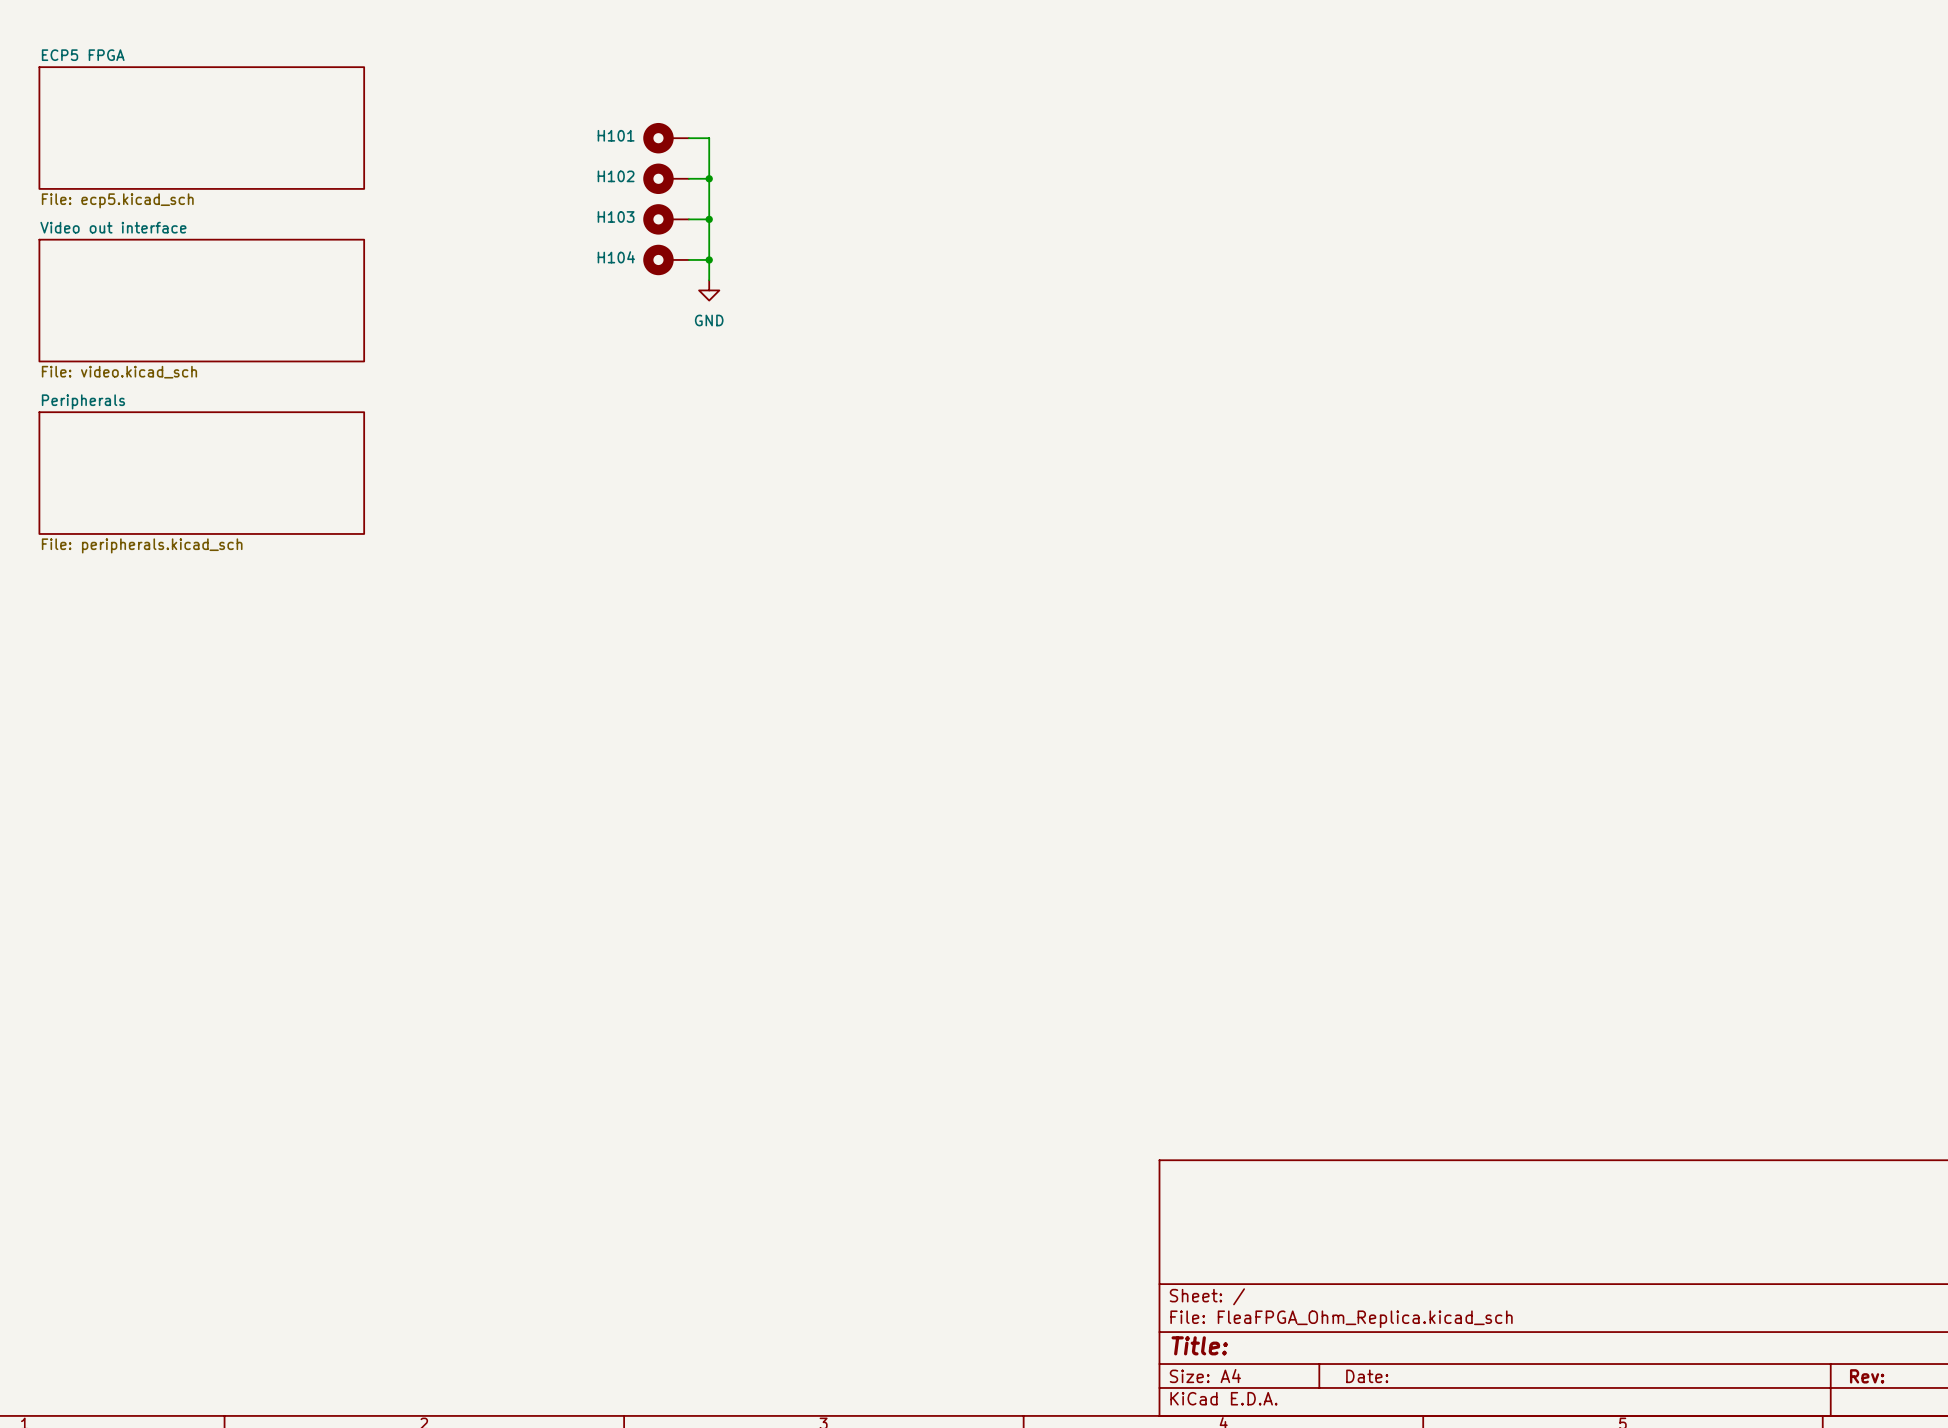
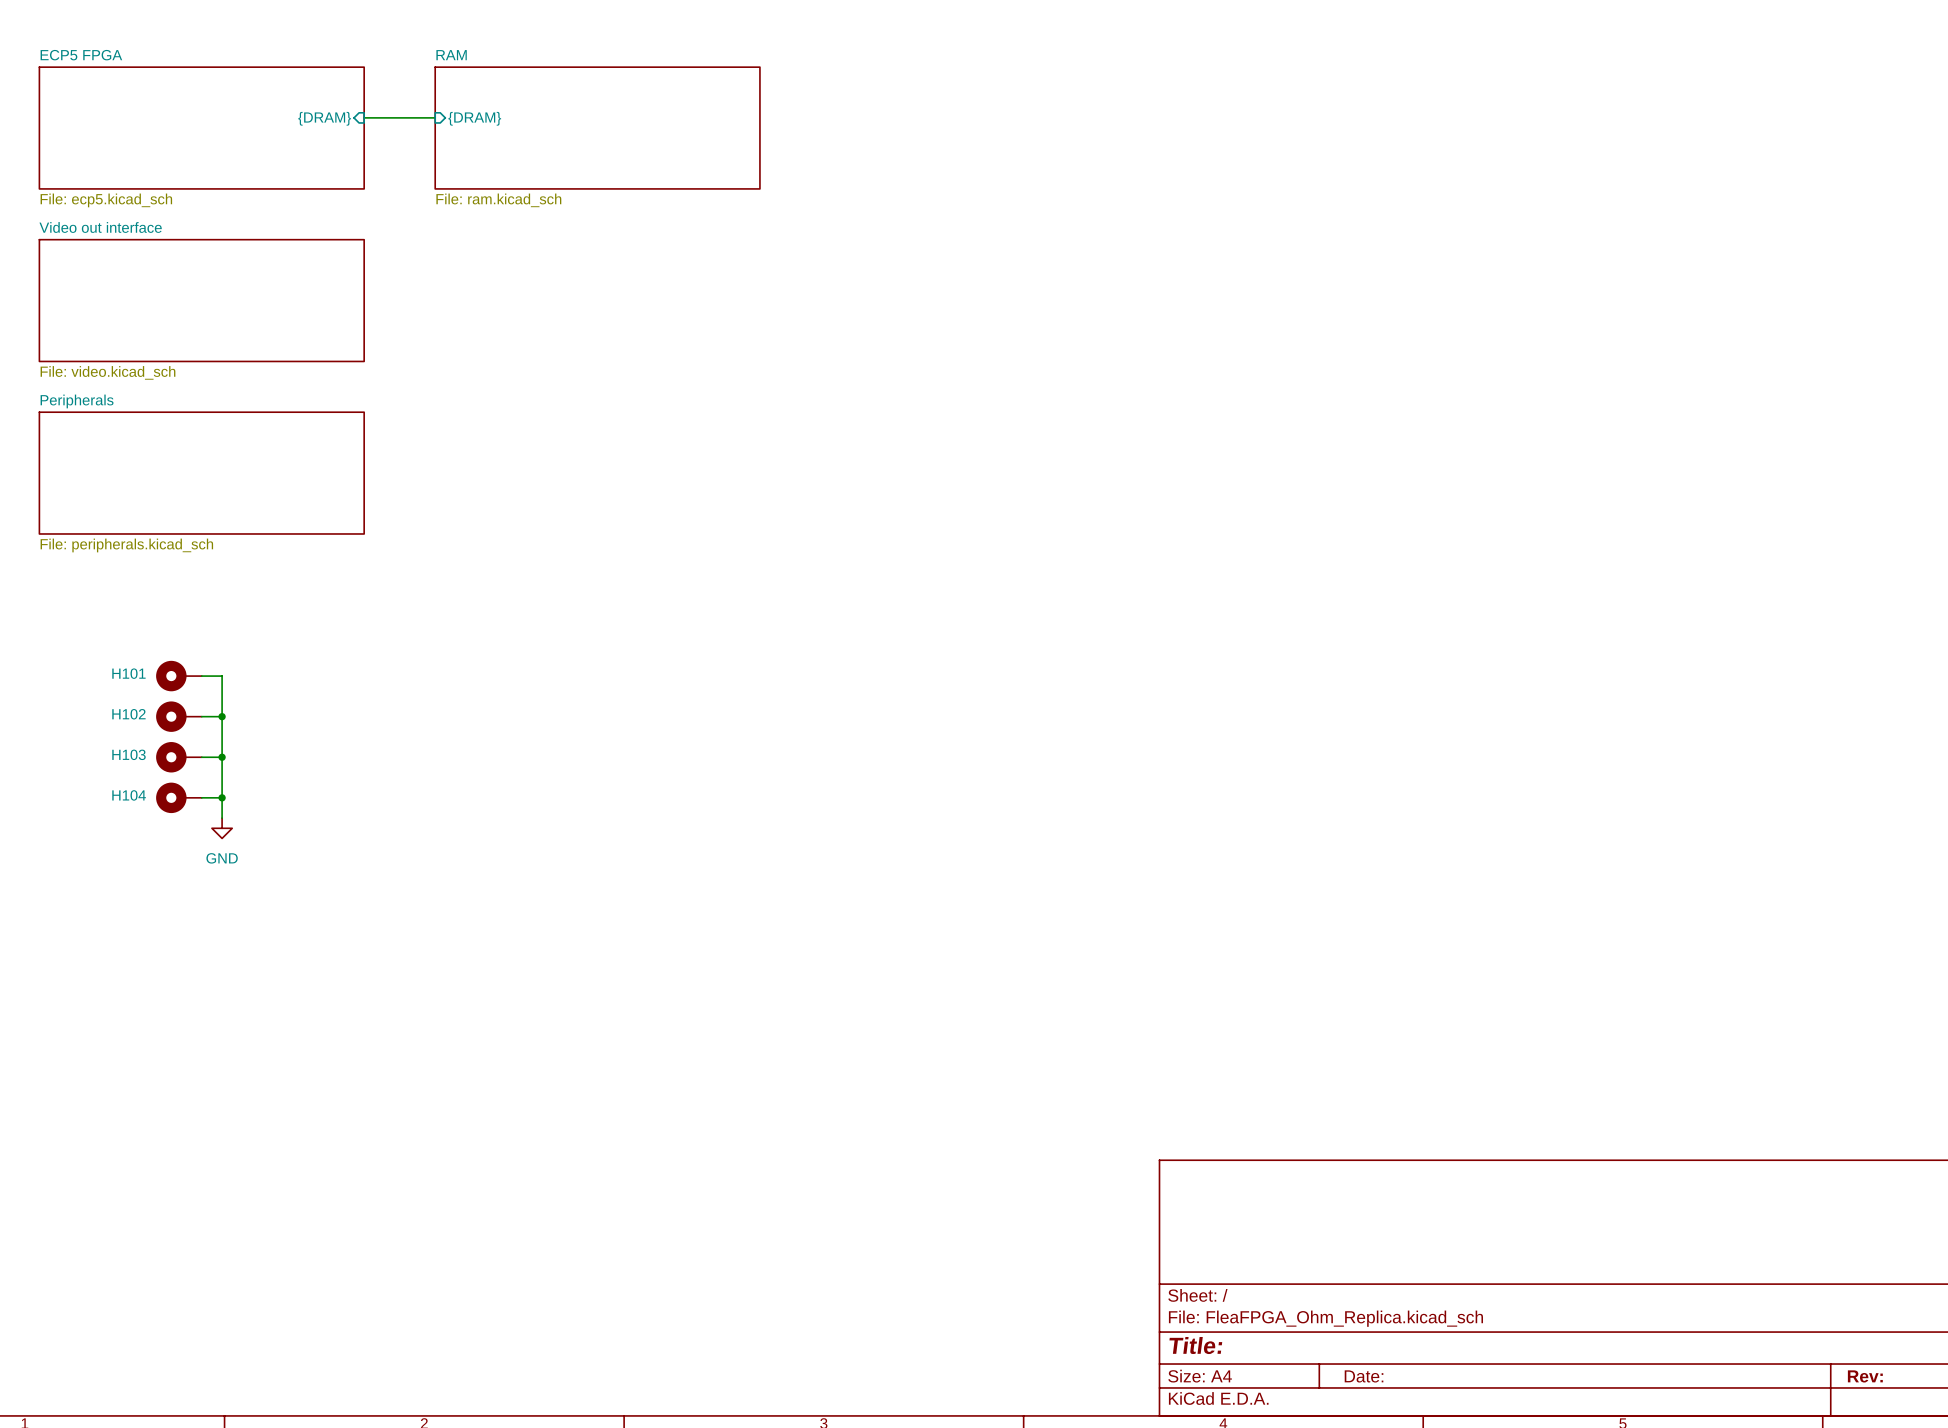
wire: none -> (364, 117) (435, 117)
sheet pin: none -> {DRAM} (324, 118)
sheet pin: none -> {DRAM} (474, 118)
sheet RAM: none -> File: ram.kicad_sch (597, 128)
H101 position: (666, 138) -> (178, 676)
wire: (688, 138) (709, 138) (709, 280) -> none
H102 position: (666, 178) -> (178, 716)
wire: (688, 178) (709, 178) -> none
junction: (709, 178) -> none
H103 position: (666, 219) -> (178, 757)
wire: (688, 219) (709, 219) -> none
junction: (709, 219) -> none
H104 position: (666, 259) -> (178, 797)
wire: (688, 259) (709, 259) -> none
junction: (709, 259) -> none
power symbol: GND (709, 290) -> none
wire: none -> (201, 676) (222, 676) (222, 818)
wire: none -> (201, 716) (222, 716)
junction: none -> (222, 716)
wire: none -> (201, 757) (222, 757)
junction: none -> (222, 757)
wire: none -> (201, 797) (222, 797)
junction: none -> (222, 797)
power symbol: none -> GND (222, 828)

